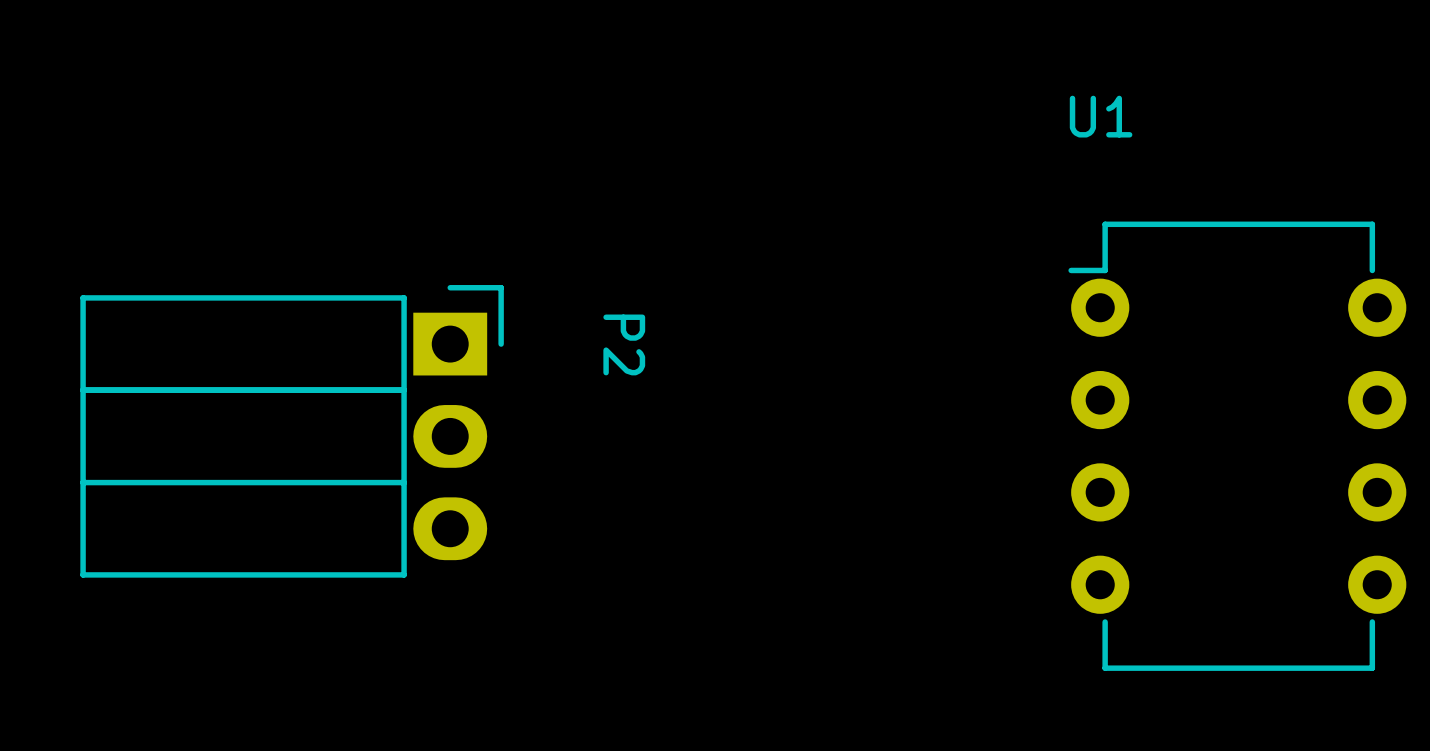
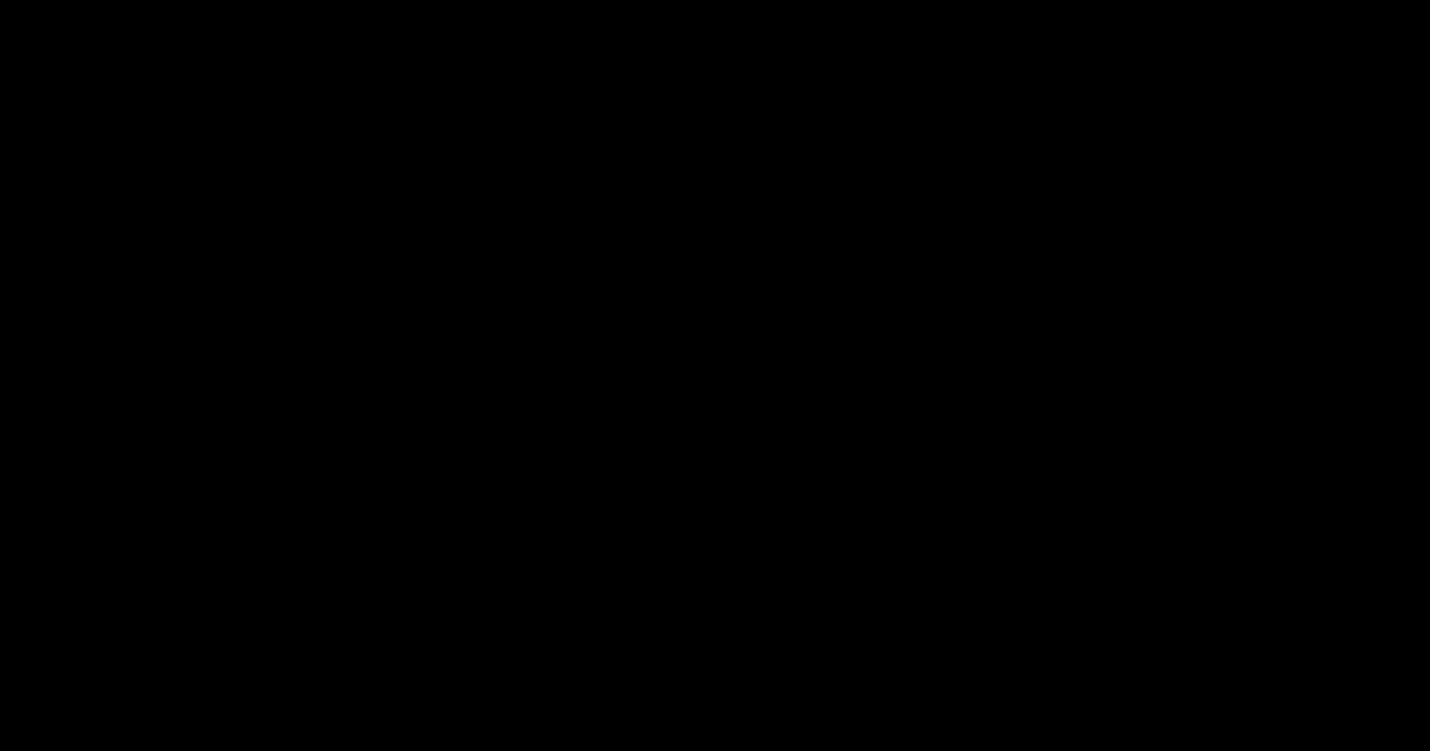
P2: (292, 431) -> none
U1: (1237, 446) -> none

